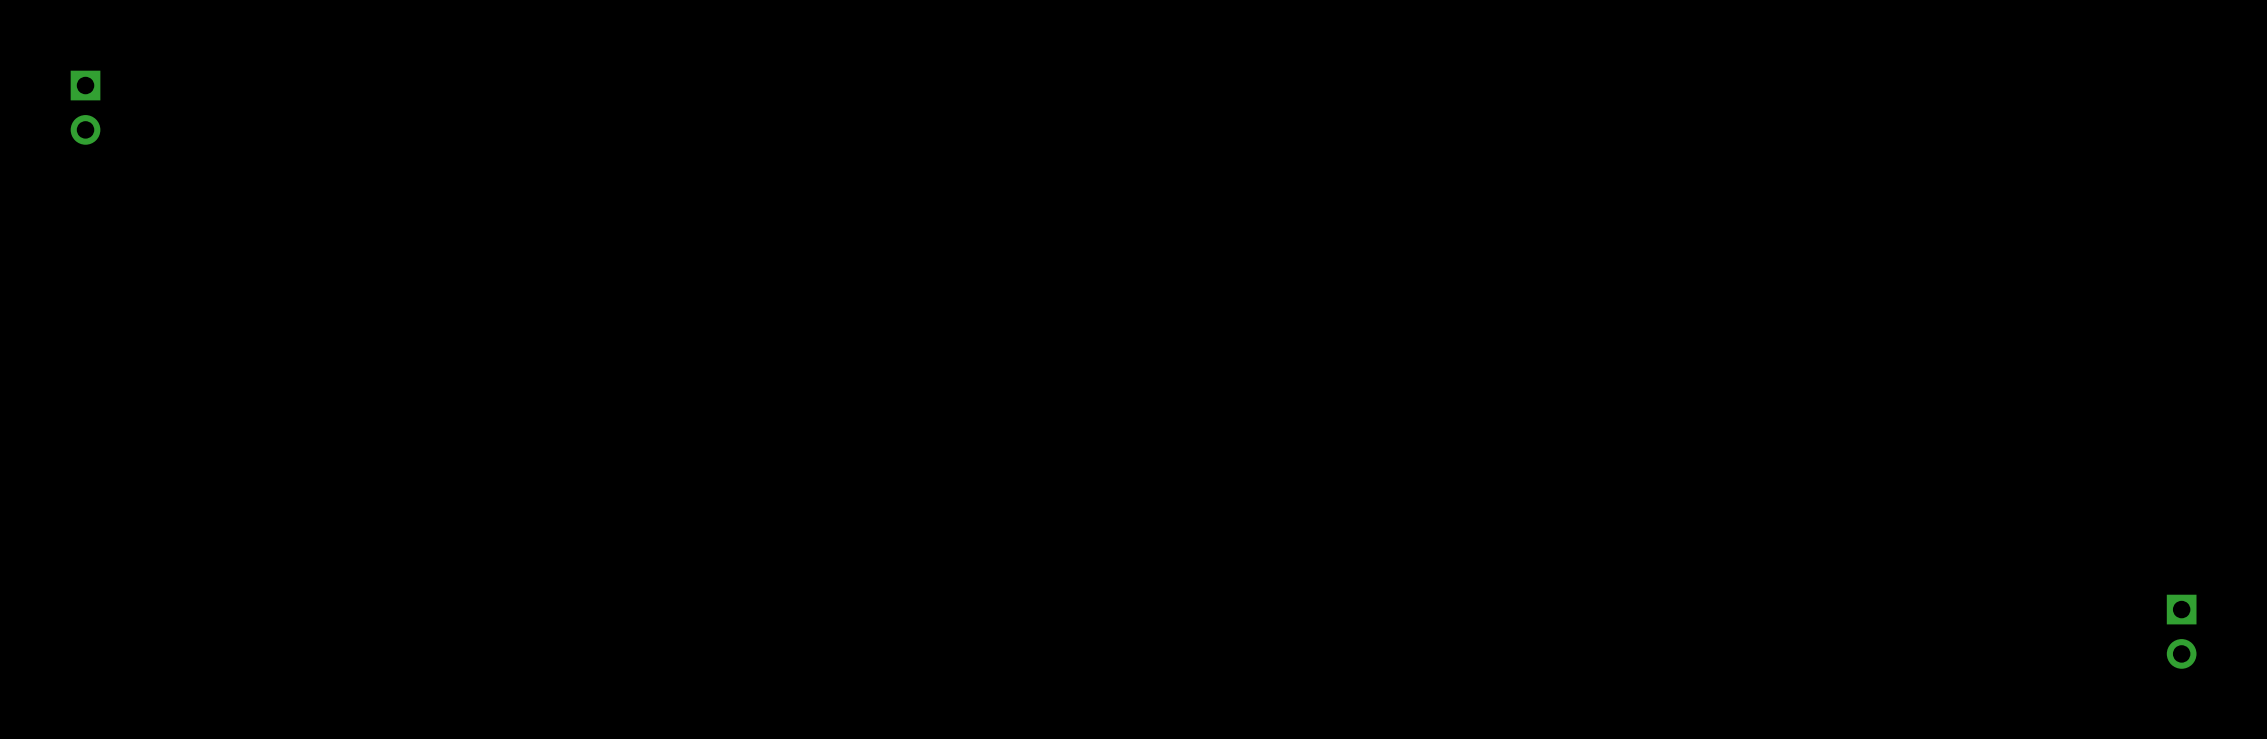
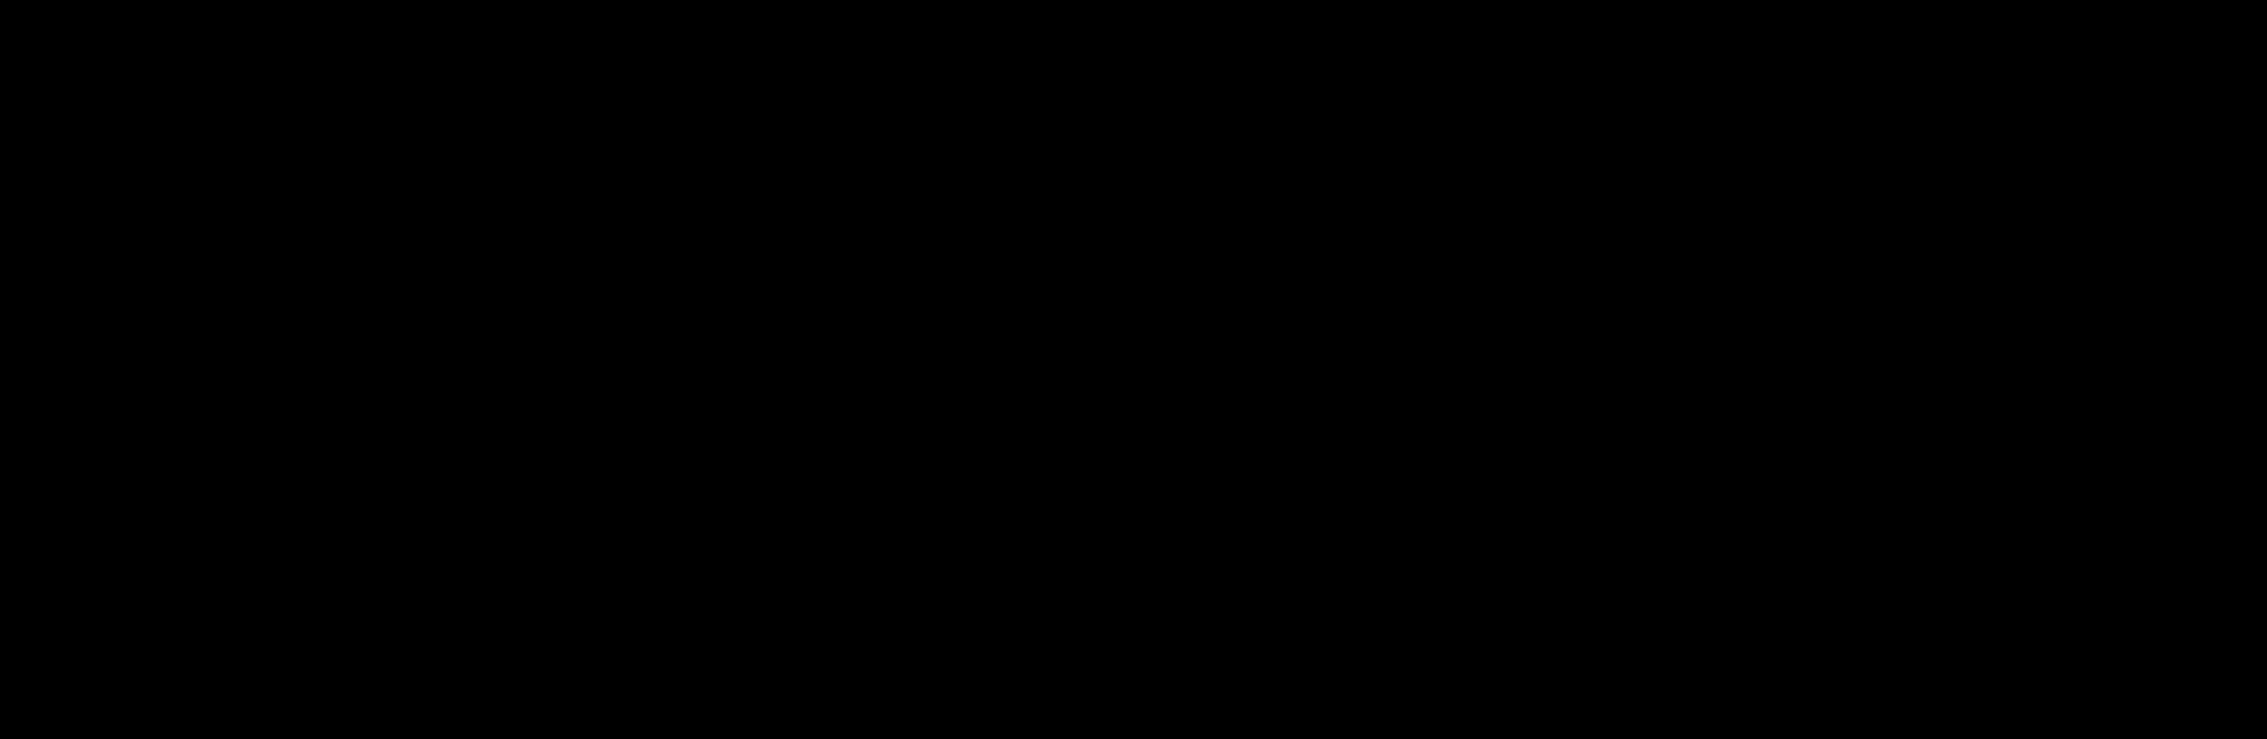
part: (85, 107) -> none
part: (2181, 631) -> none

